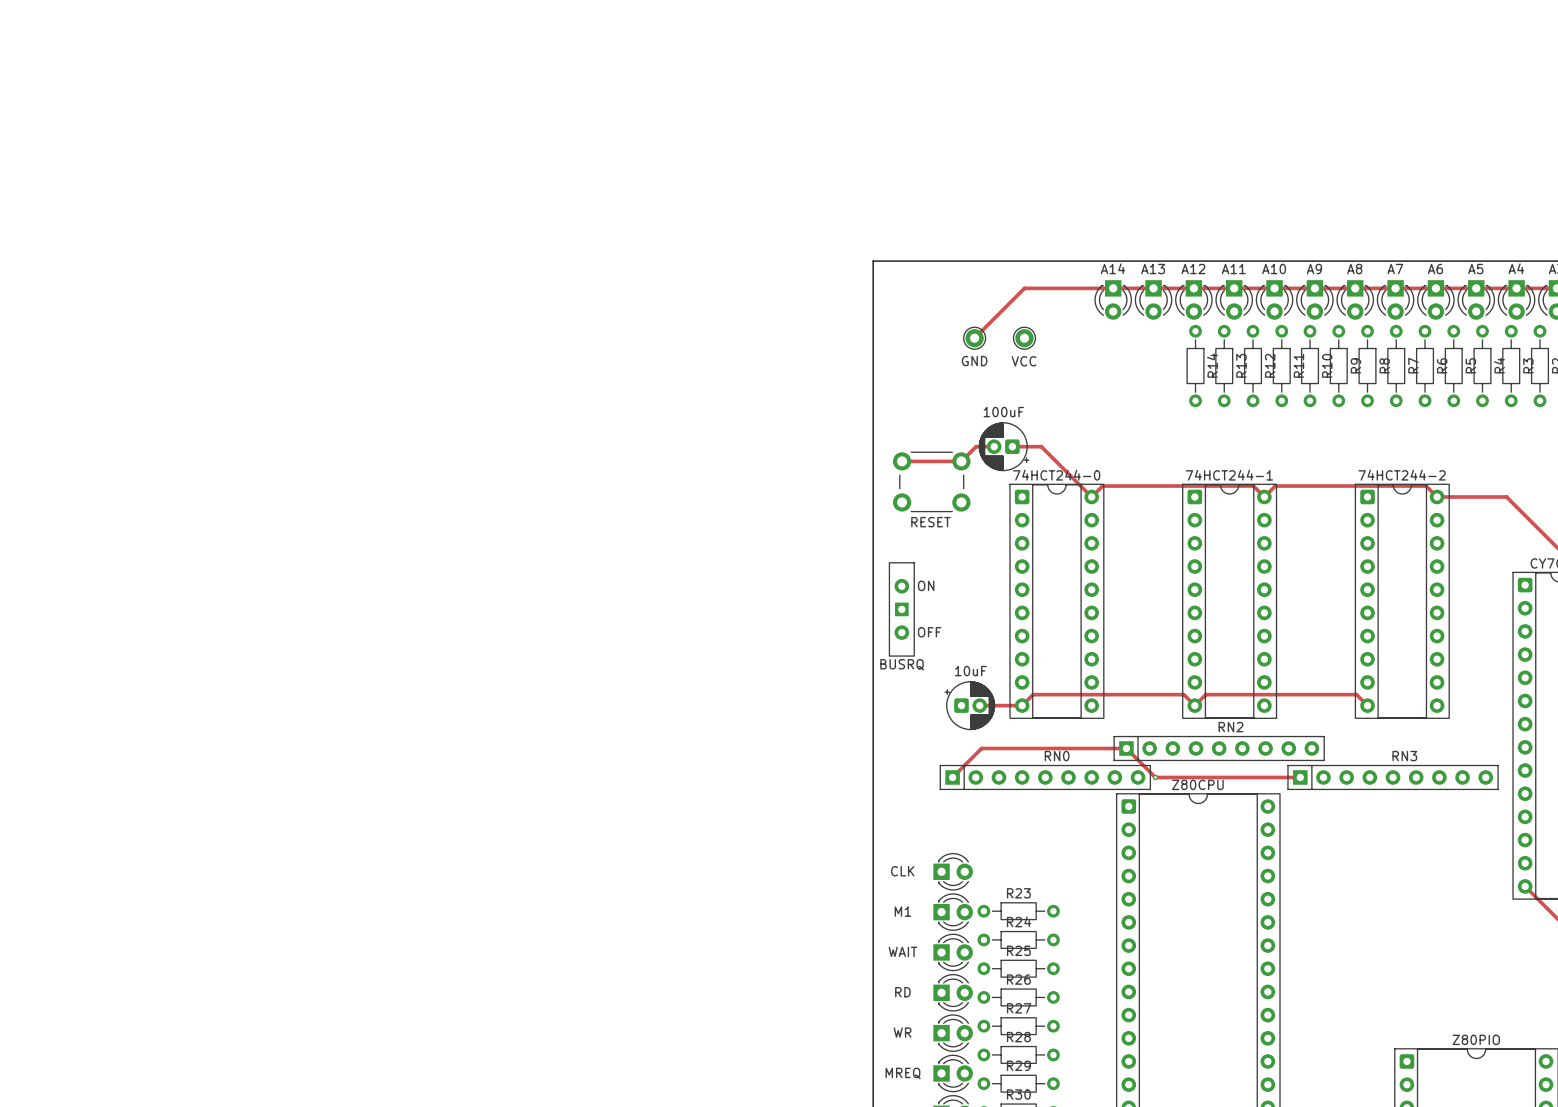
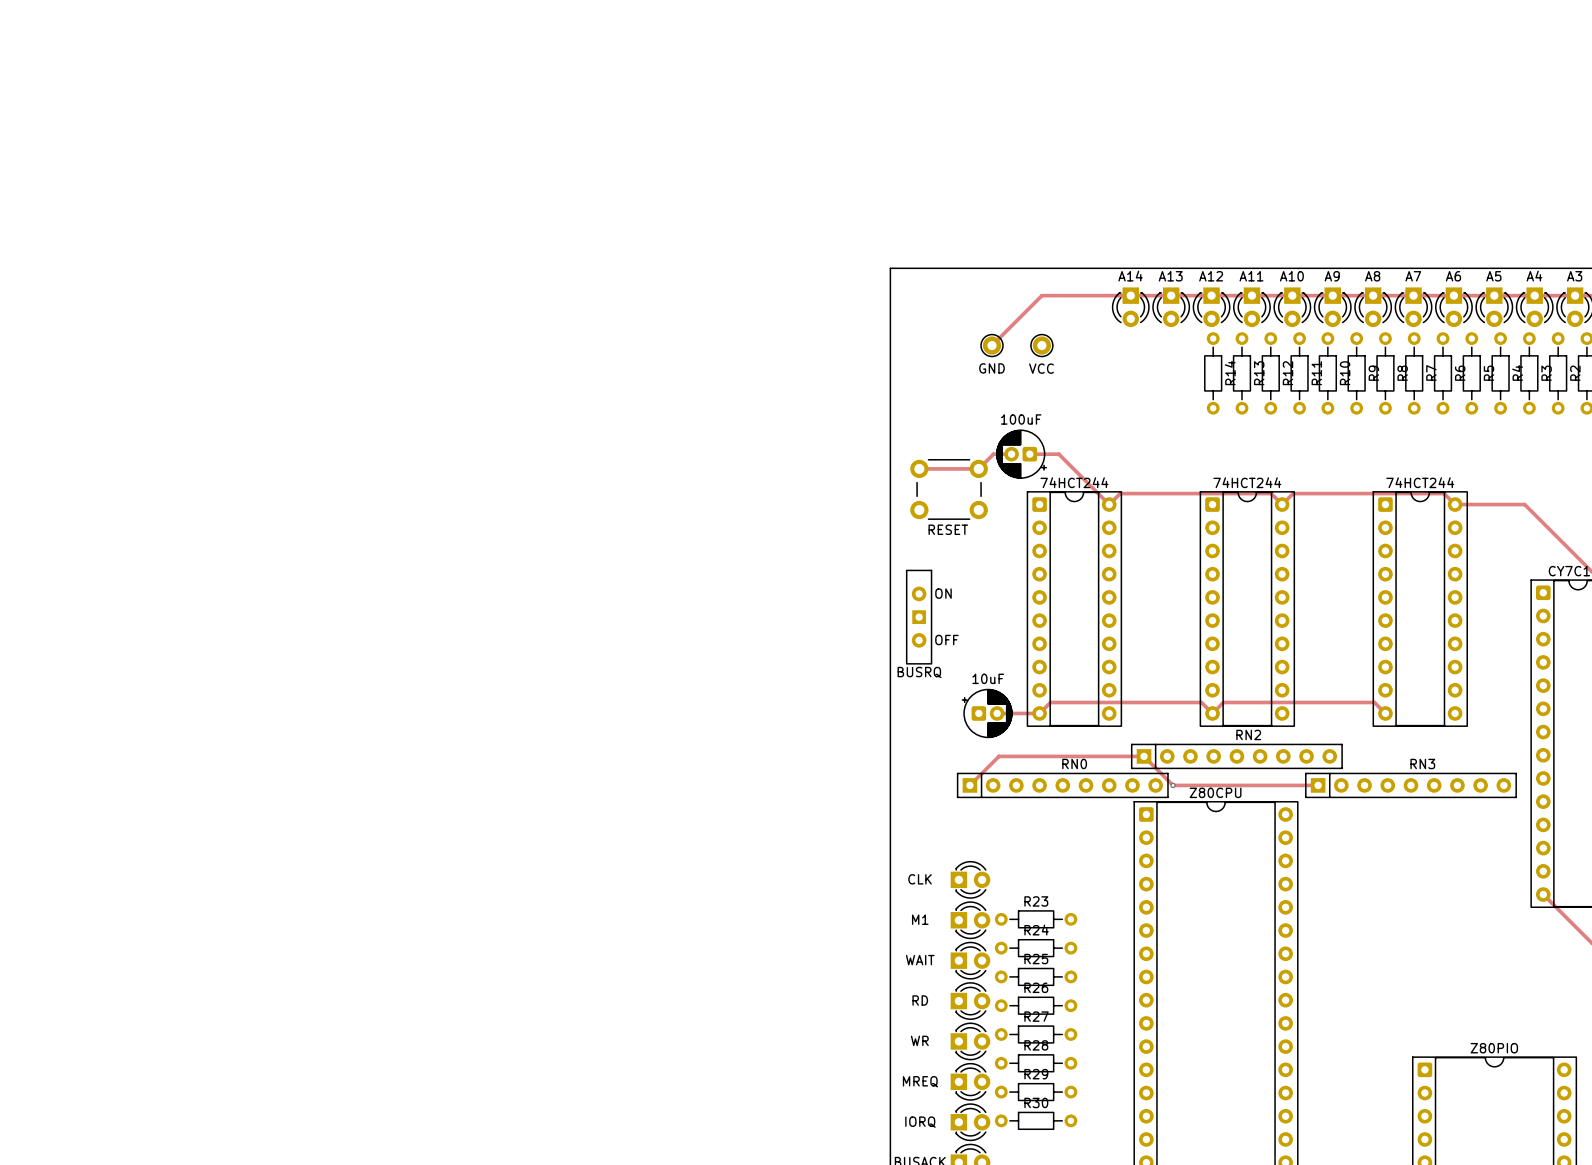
74HCT244-0 name: 74HCT244-0 (1056, 475) -> 74HCT244 (1074, 482)
74HCT244-1 name: 74HCT244-1 (1229, 475) -> 74HCT244 (1247, 482)
74HCT244-2 name: 74HCT244-2 (1402, 475) -> 74HCT244 (1420, 482)

